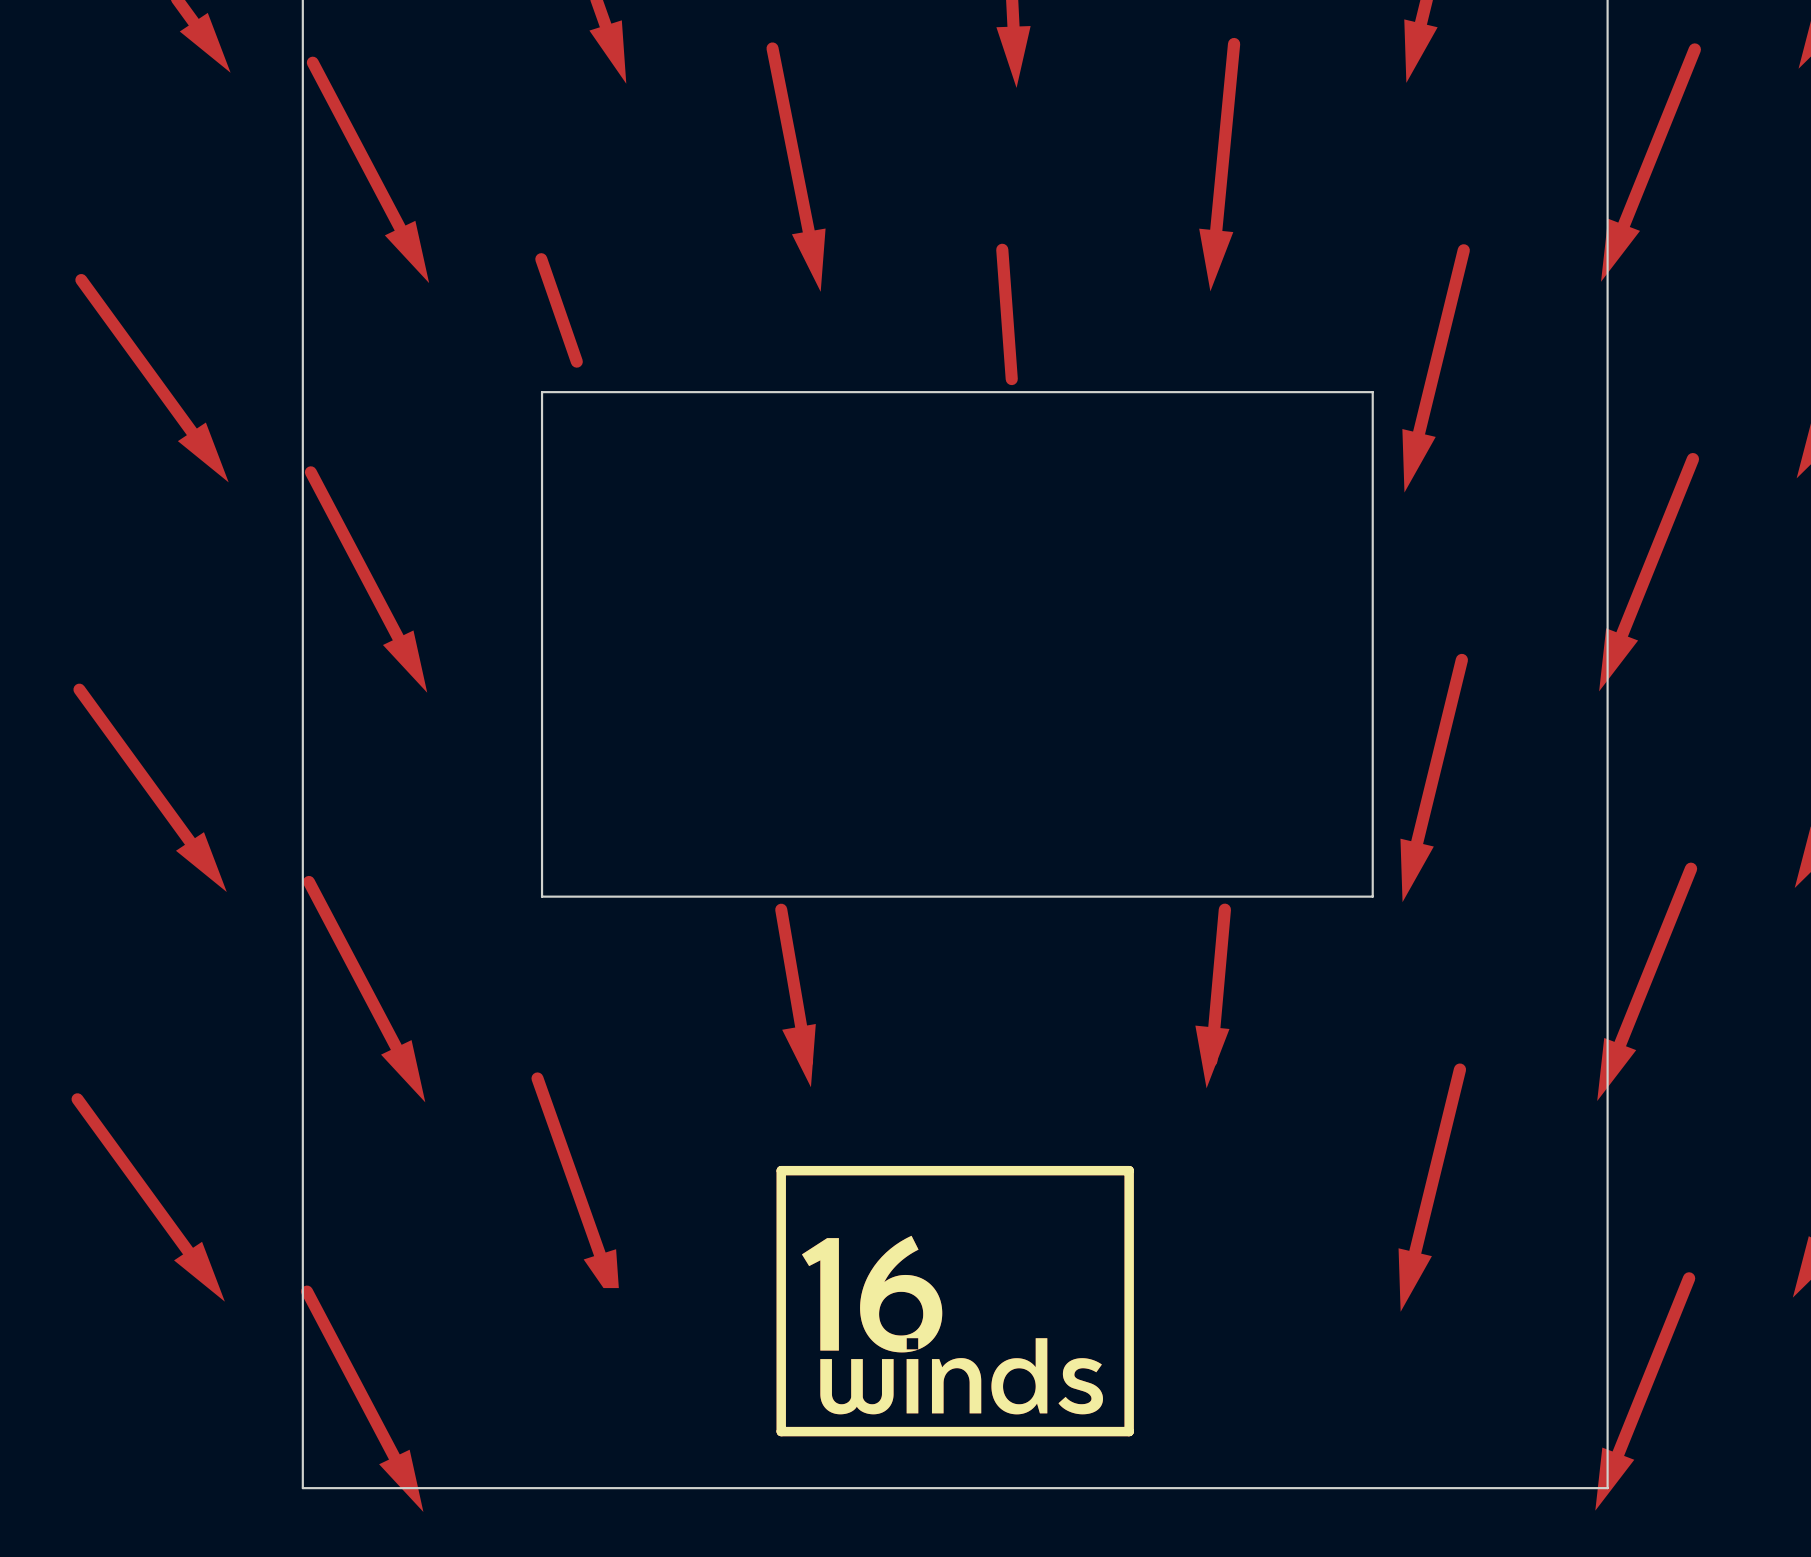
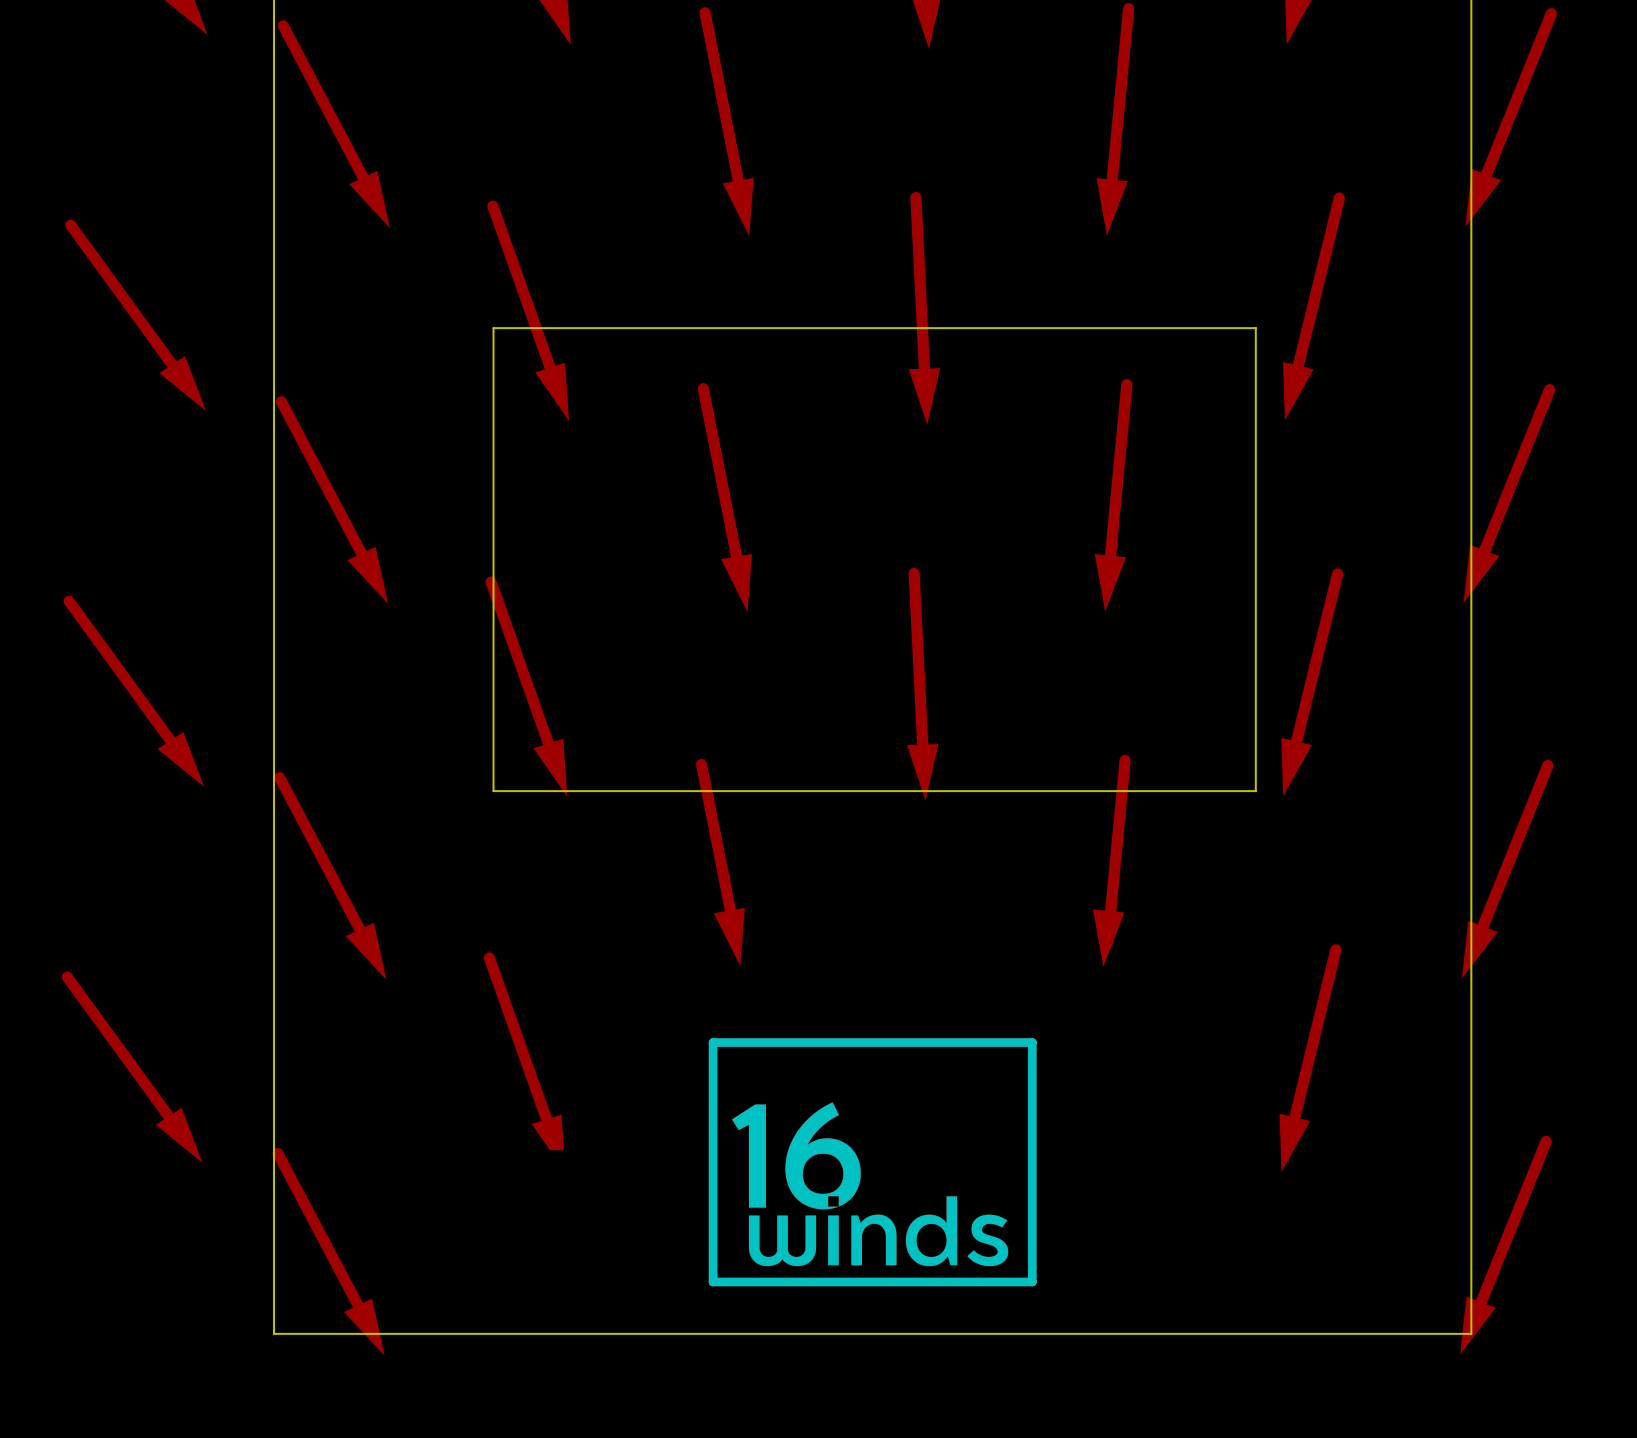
track: (1002, 249) (1011, 379) -> (915, 197) (924, 378)
track: (541, 259) (576, 361) -> (492, 206) (553, 377)
drawing: none -> [535, 362, 570, 422]
drawing: none -> [908, 368, 941, 425]
track: none -> (1126, 384) (1109, 565)
track: none -> (703, 388) (738, 566)
drawing: none -> [721, 553, 752, 612]
drawing: none -> [1094, 554, 1127, 612]
track: none -> (914, 573) (923, 754)
track: none -> (491, 582) (551, 753)
drawing: none -> [533, 738, 568, 797]
drawing: none -> [906, 743, 939, 801]
track: (781, 909) (807, 1061) -> (701, 764) (736, 942)
track: (1224, 909) (1211, 1060) -> (1125, 760) (1107, 941)

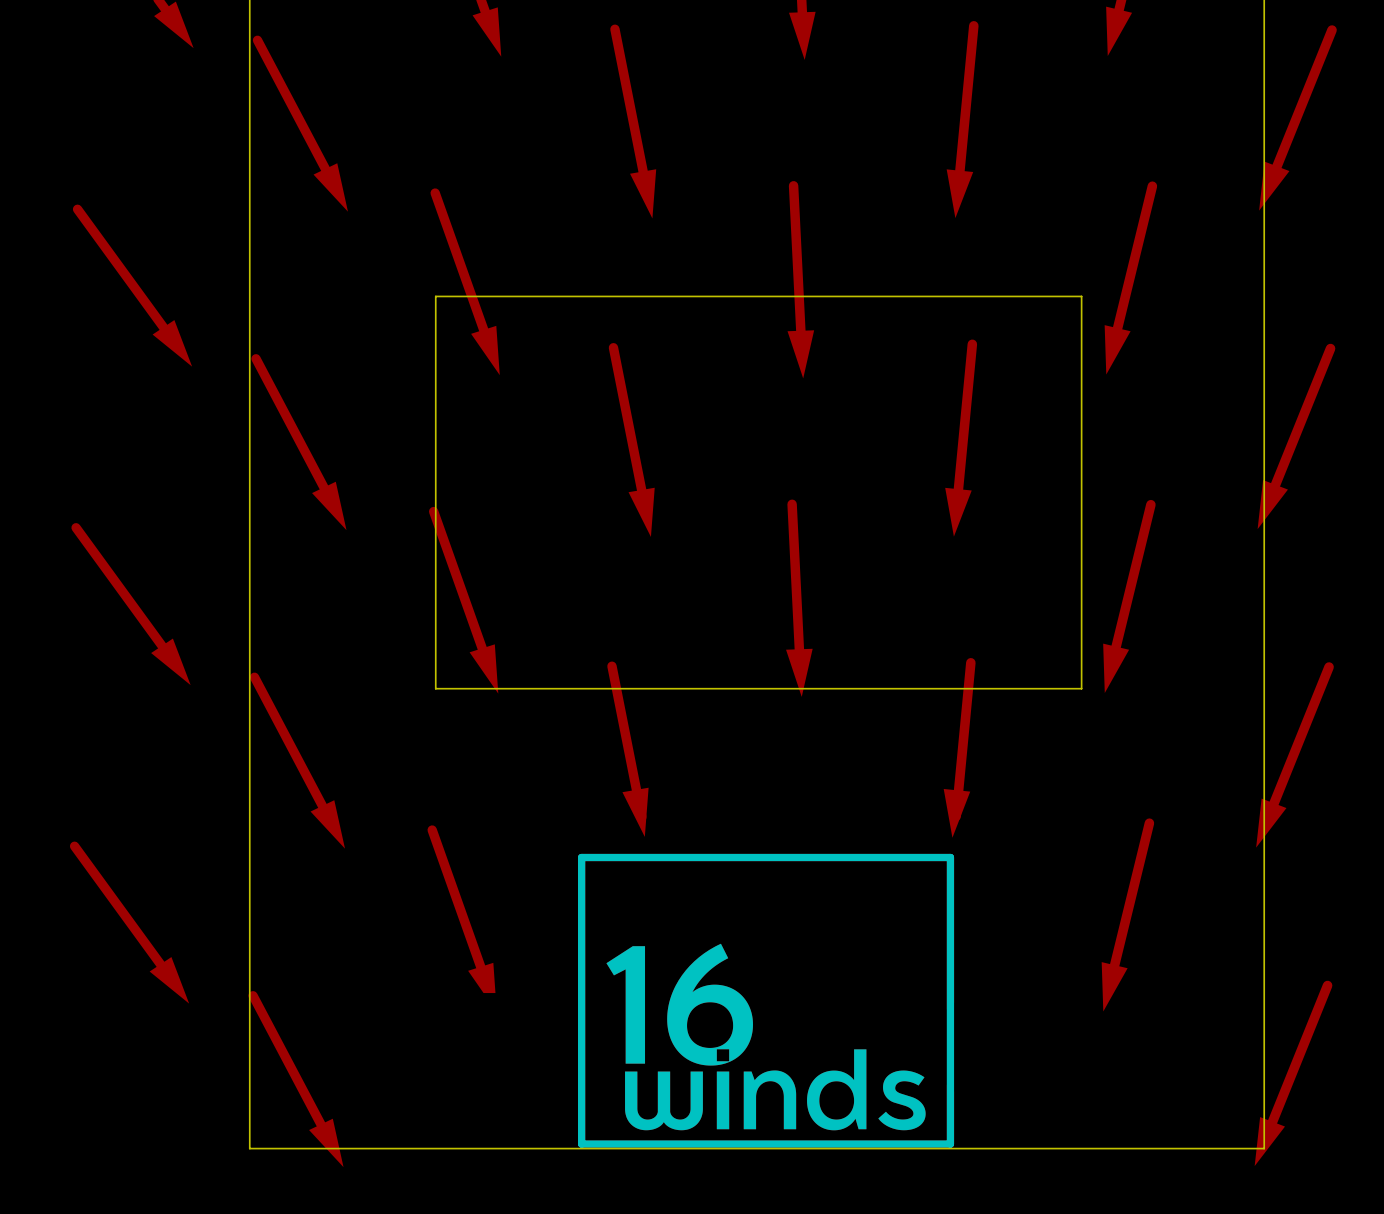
line: (713, 1042) (713, 1282) (1032, 1282) (1032, 1042) (713, 1042) -> (581, 857) (581, 1144) (950, 1144) (950, 857) (581, 857)
drawing: none -> [606, 943, 926, 1131]
drawing: [732, 1102, 1009, 1267] -> none

